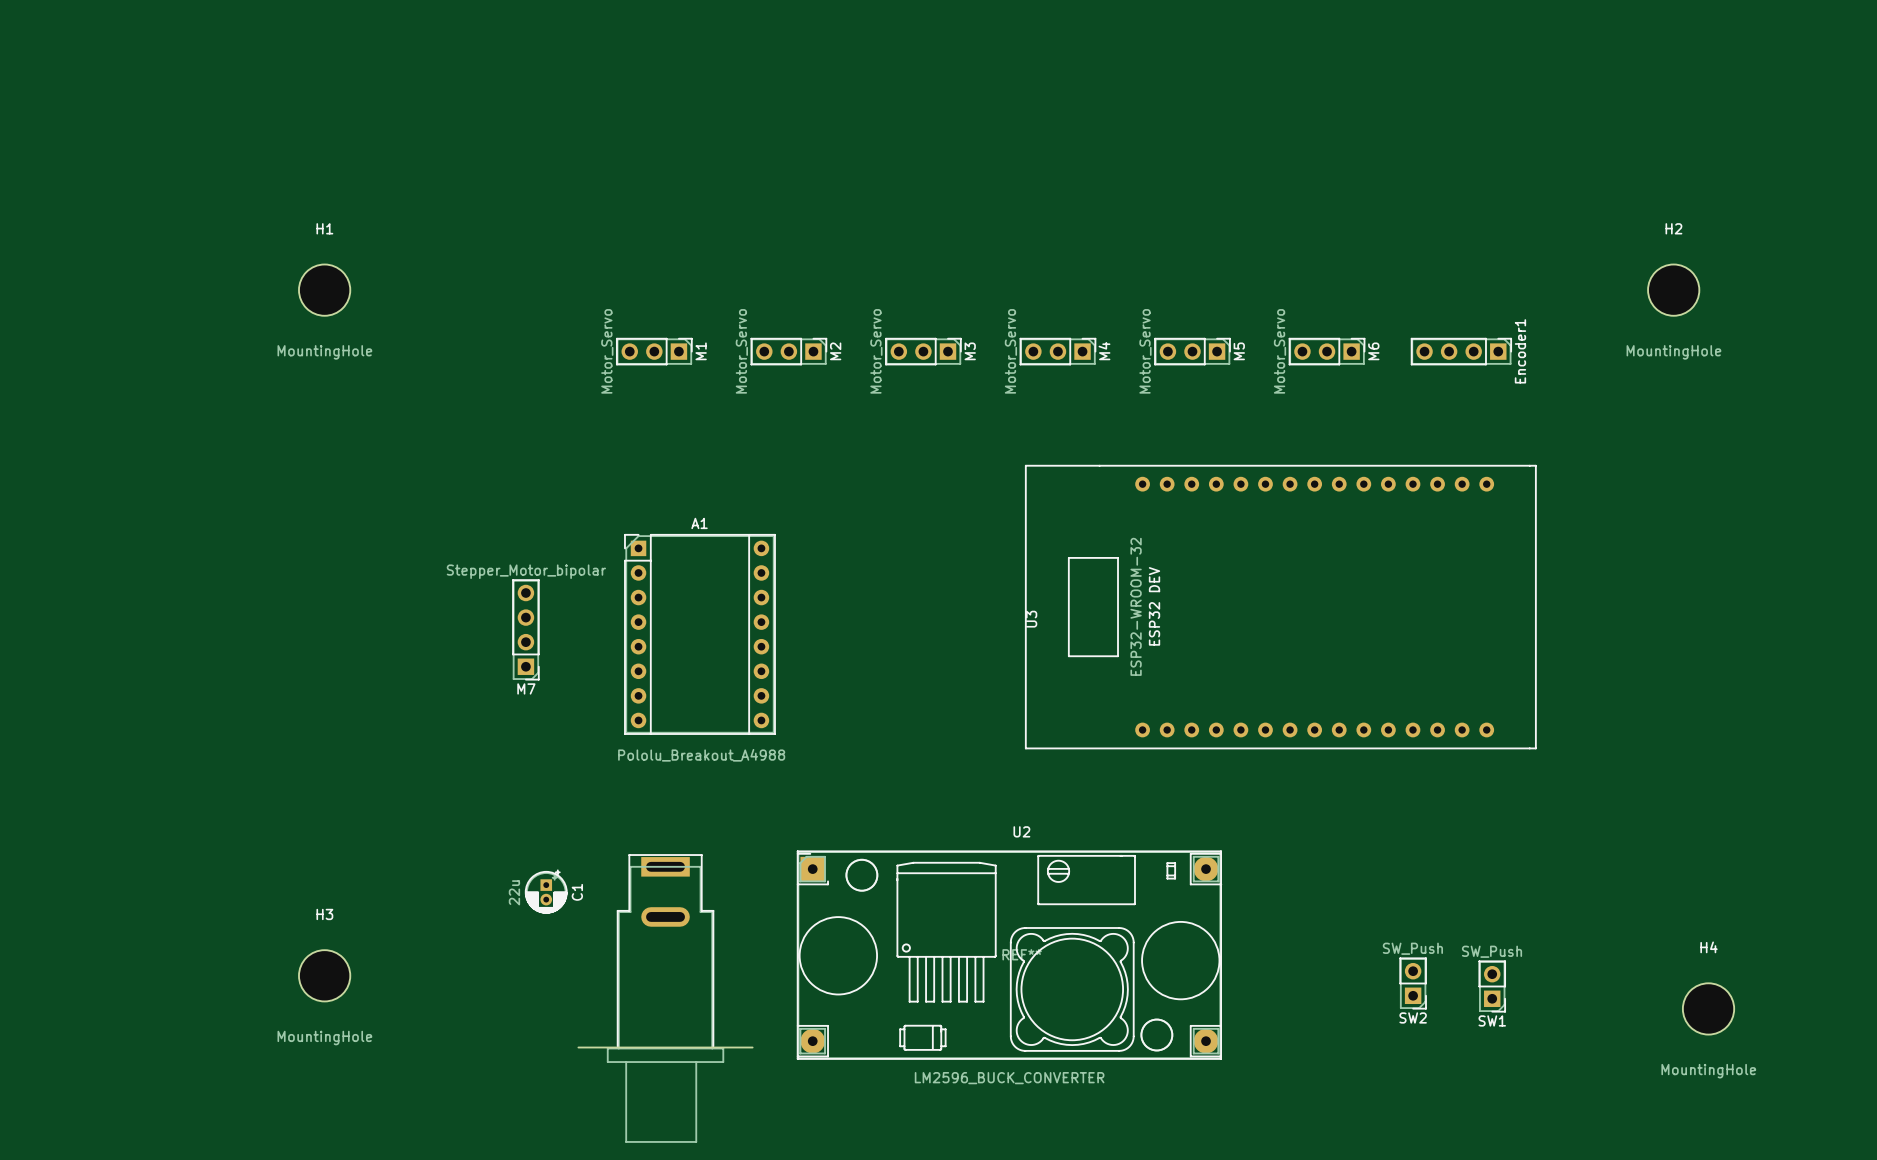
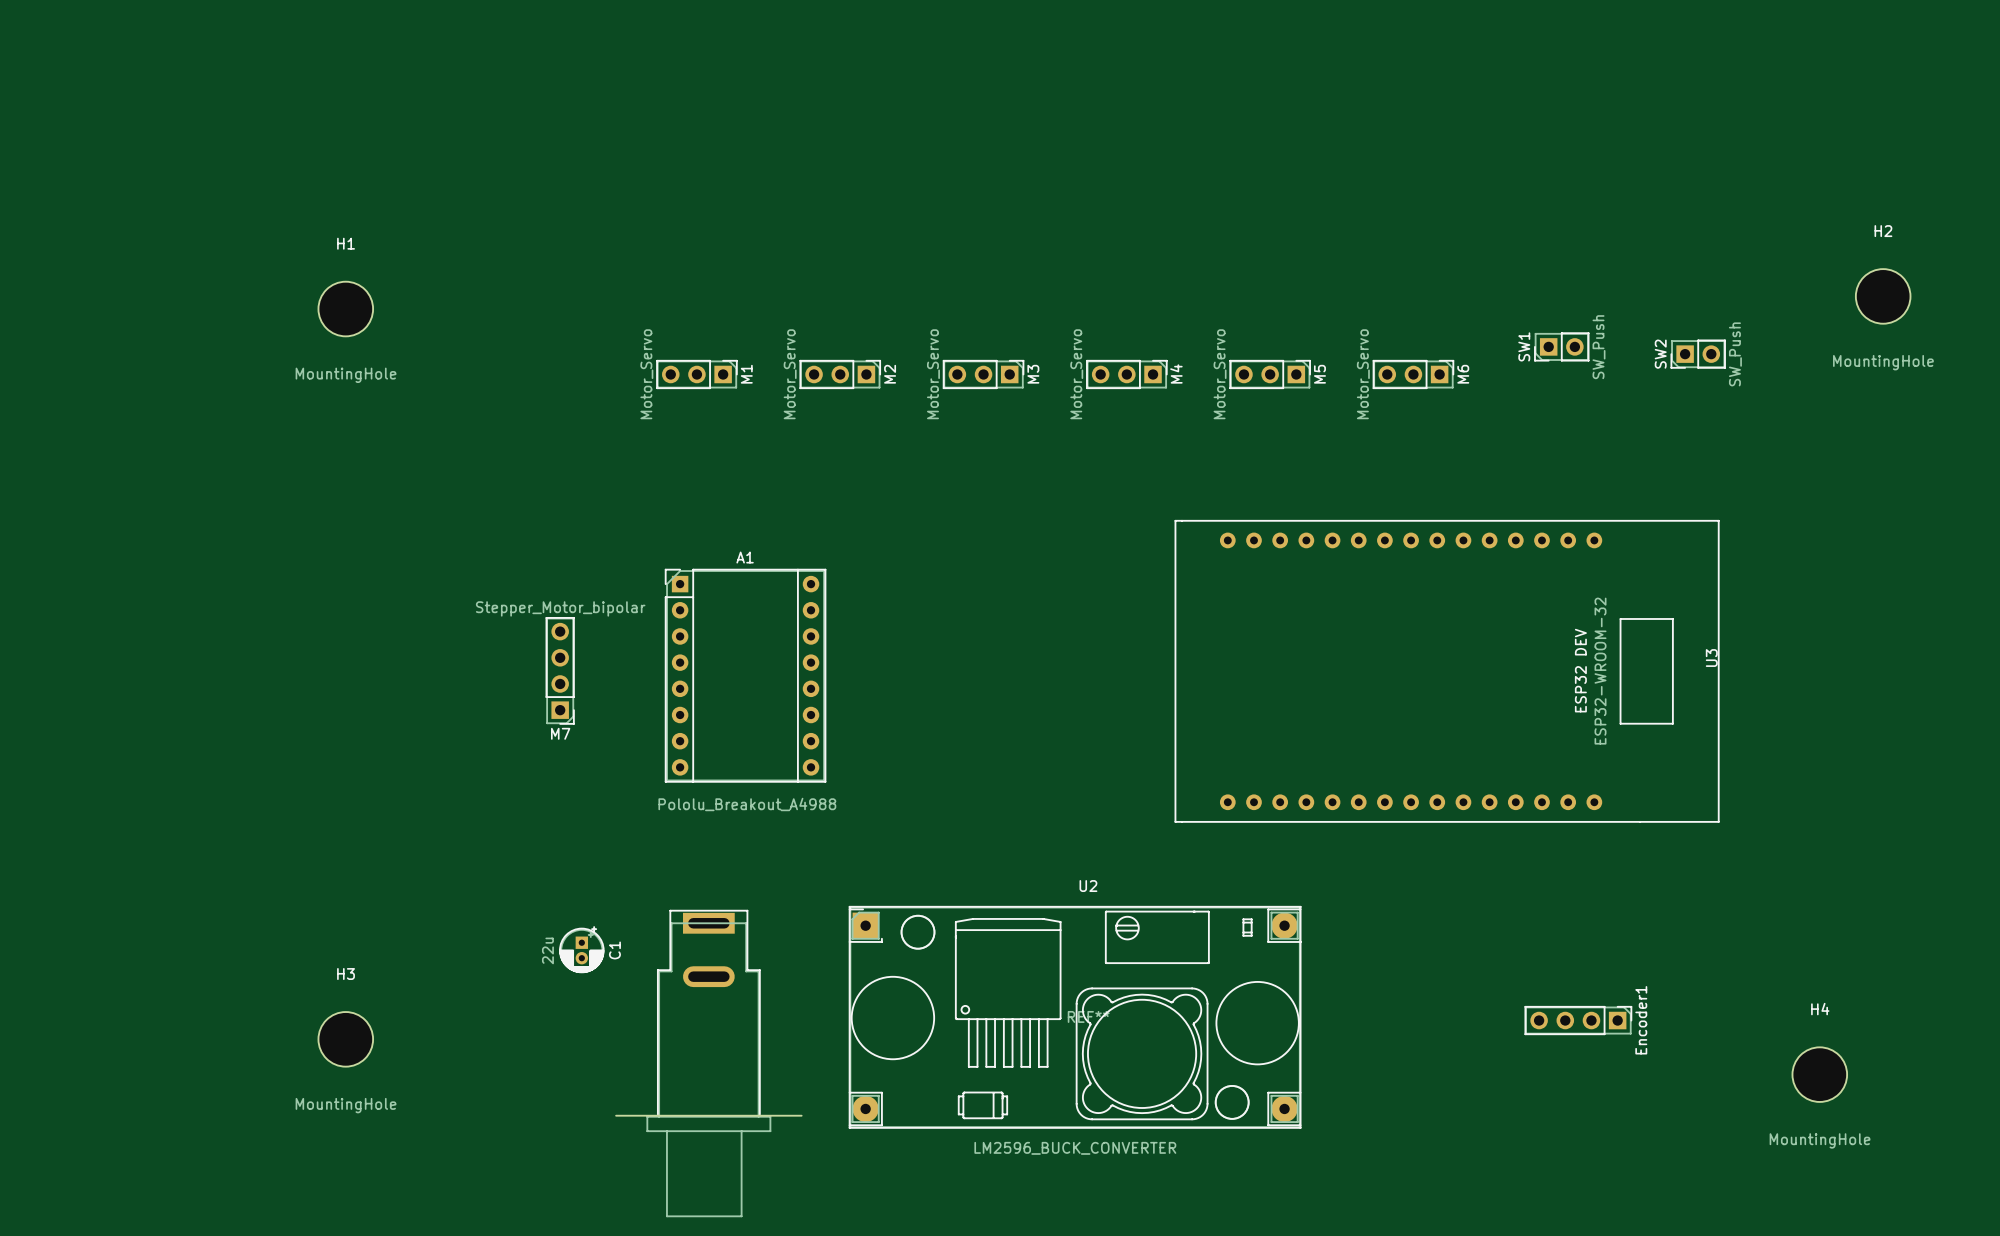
H2 position: (1673, 290) -> (1883, 296)
Encoder1 position: (1461, 351) -> (1578, 1020)
U3 rotation: 0° (1280, 607) -> 180° (1447, 671)
SW2 rotation: 0° (1413, 983) -> 90° clockwise (1698, 354)
SW2 position: (1413, 983) -> (1698, 354)
SW1 rotation: 0° (1492, 986) -> 90° clockwise (1561, 346)
SW1 position: (1492, 986) -> (1561, 346)

